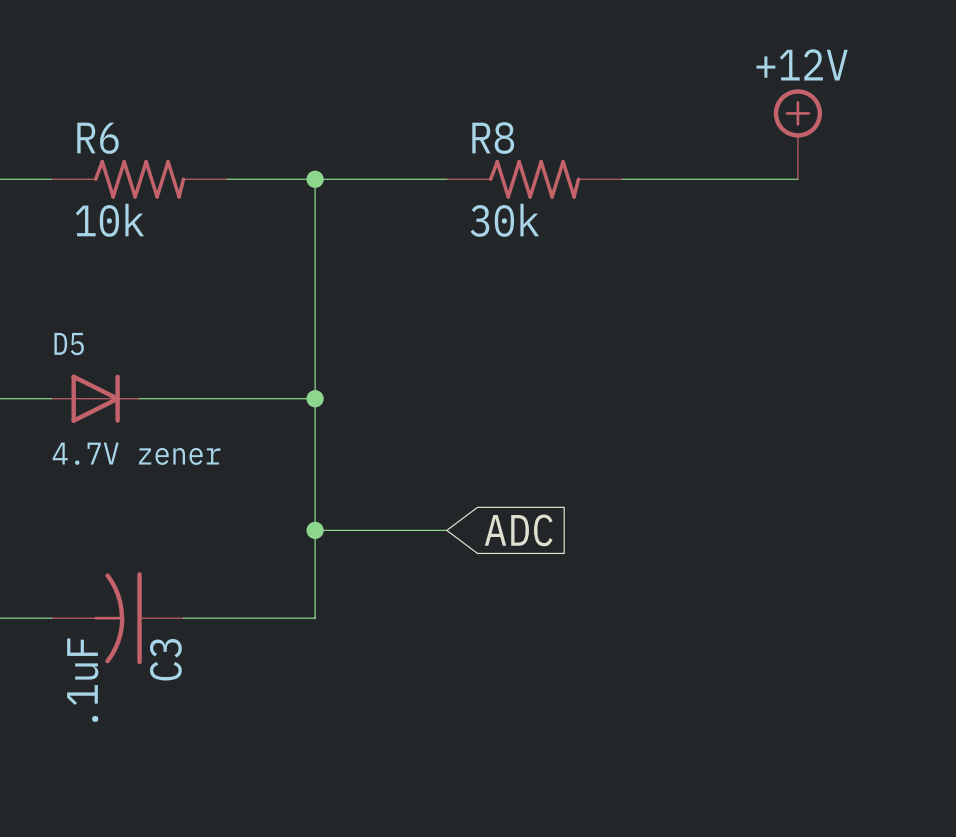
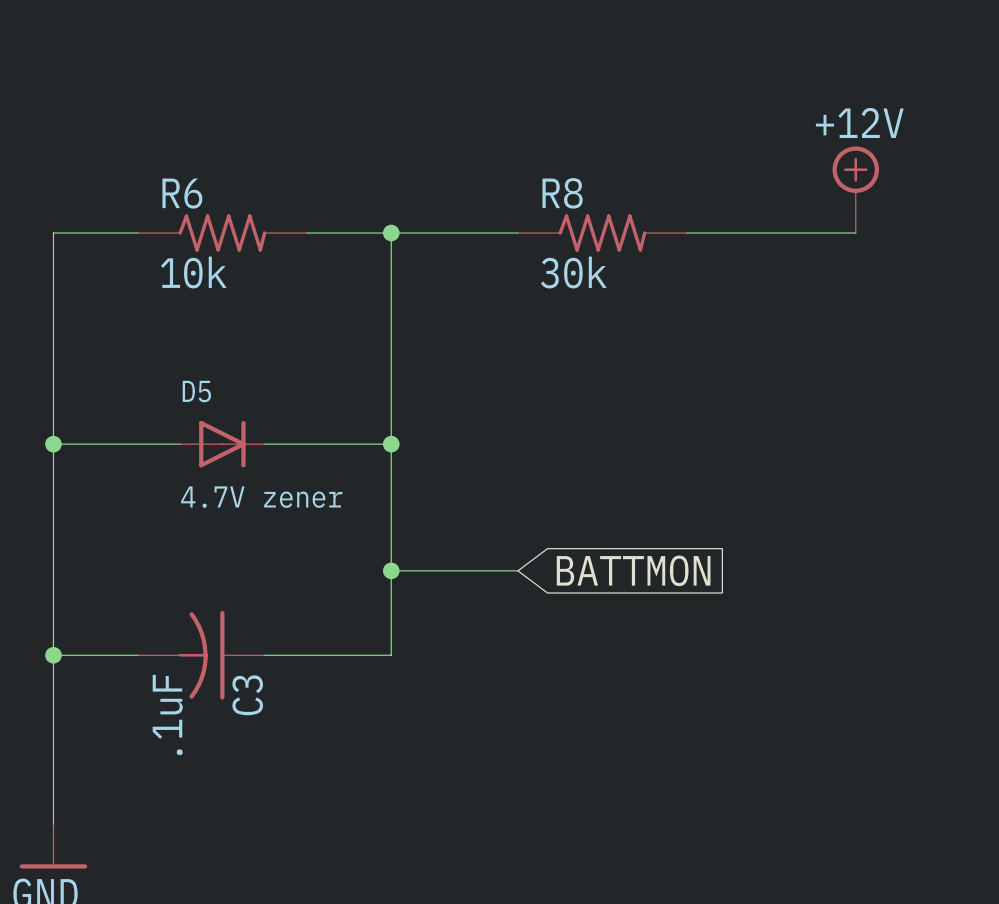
D5 position: (95, 398) -> (222, 444)
global label: ADC (518, 530) -> BATTMON (633, 570)

